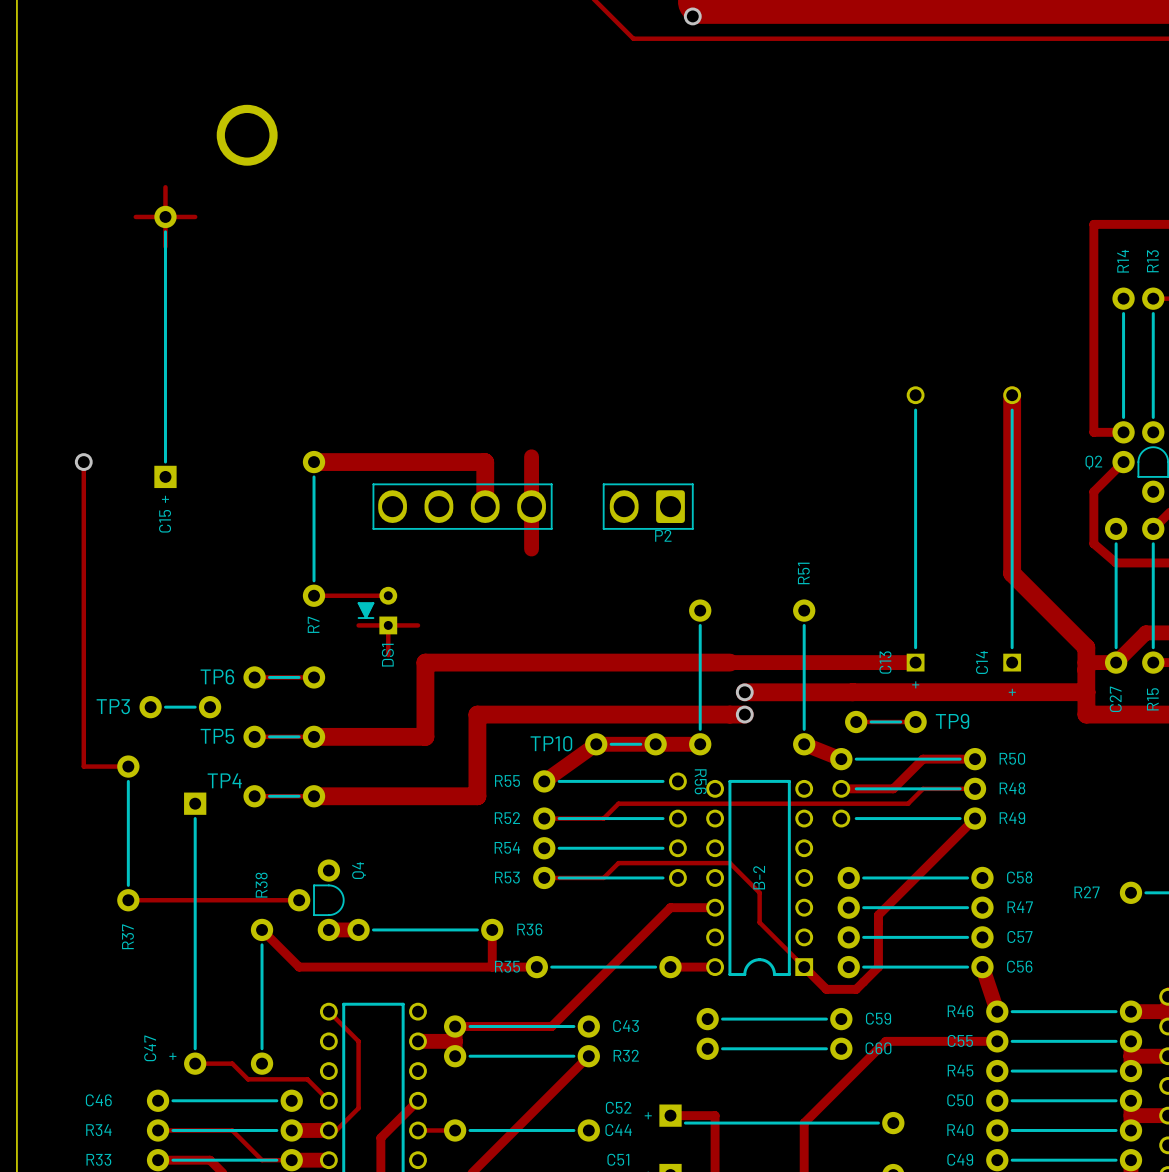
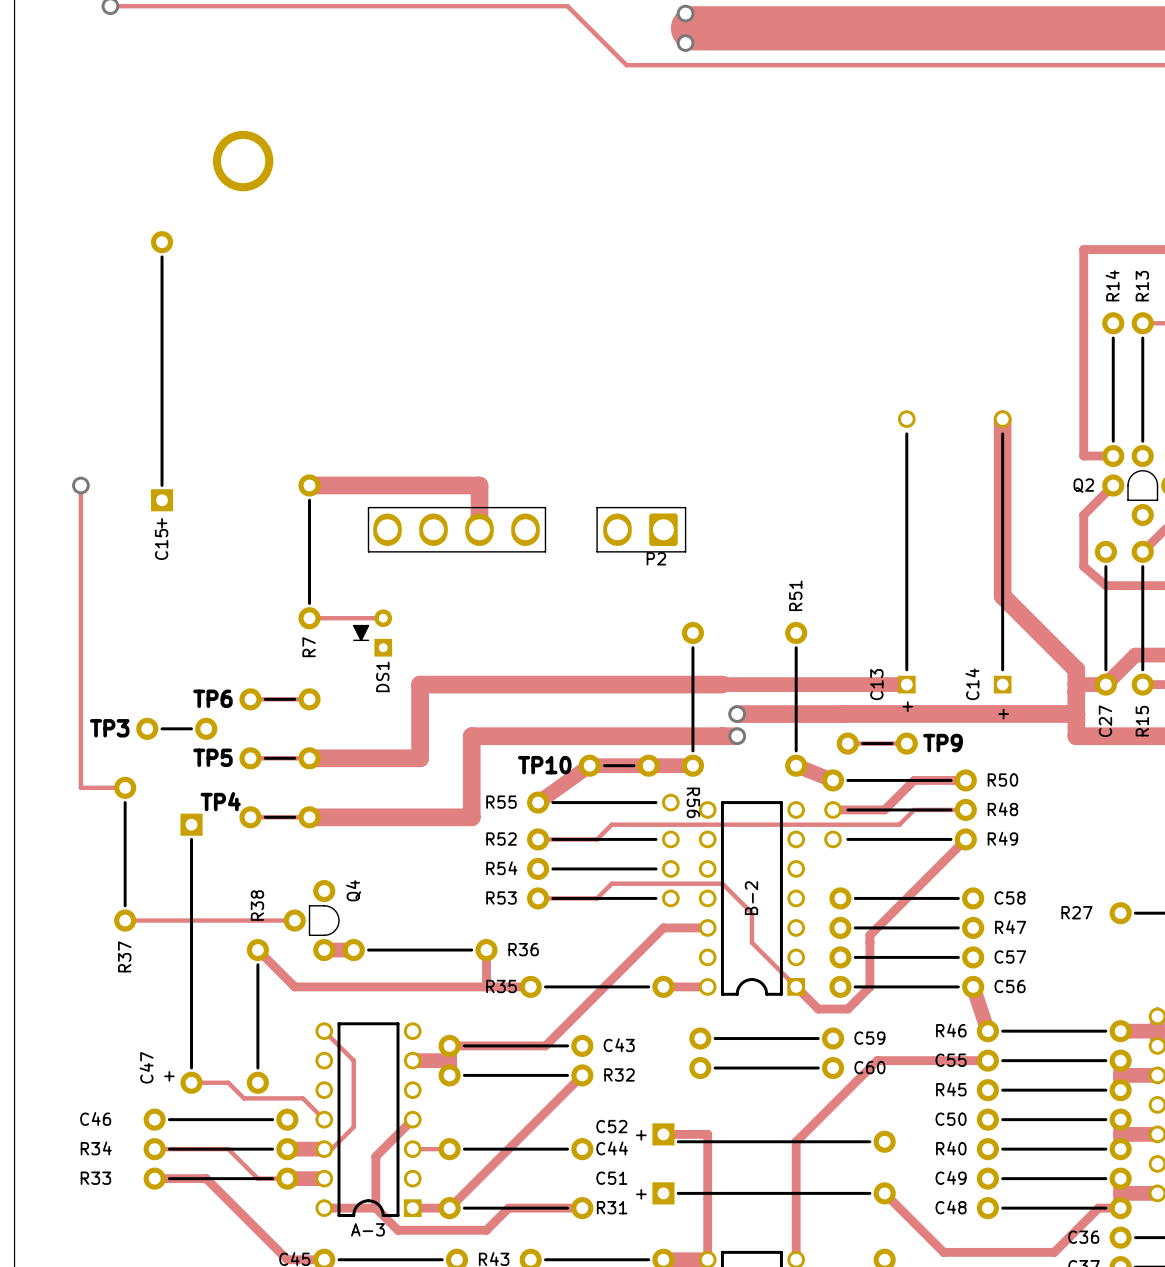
track: (165, 187) (165, 246) -> none
track: (135, 216) (195, 216) -> none
track: (531, 456) (531, 549) -> none
track: (358, 625) (417, 625) -> none
track: (388, 625) (388, 655) -> none

